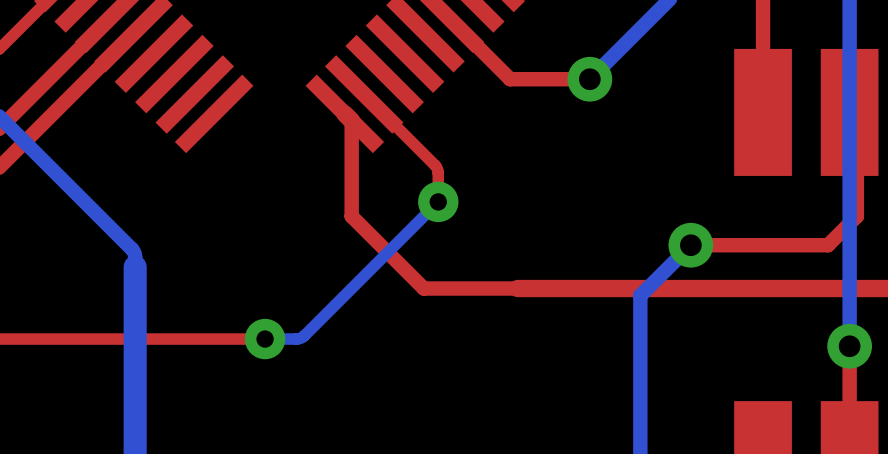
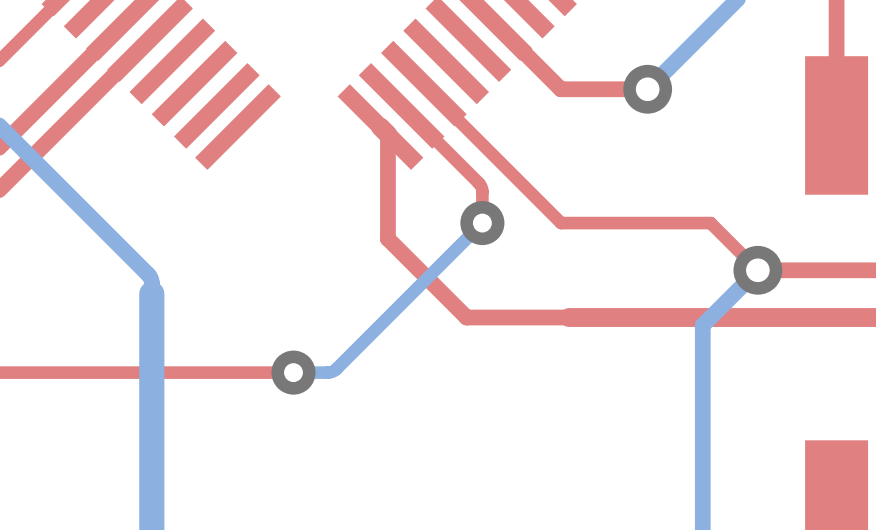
top track: none -> (423, 83) (423, 85) (561, 223) (710, 223) (757, 270)

